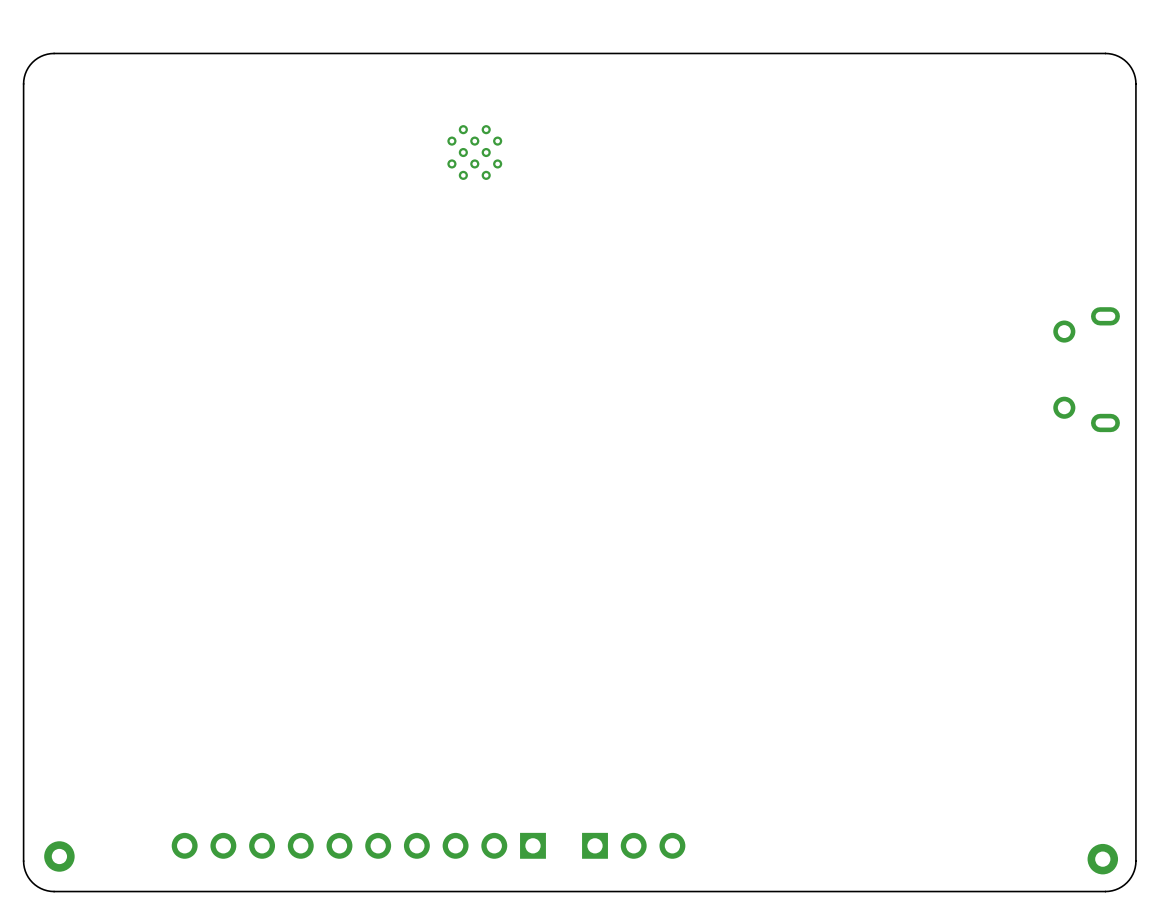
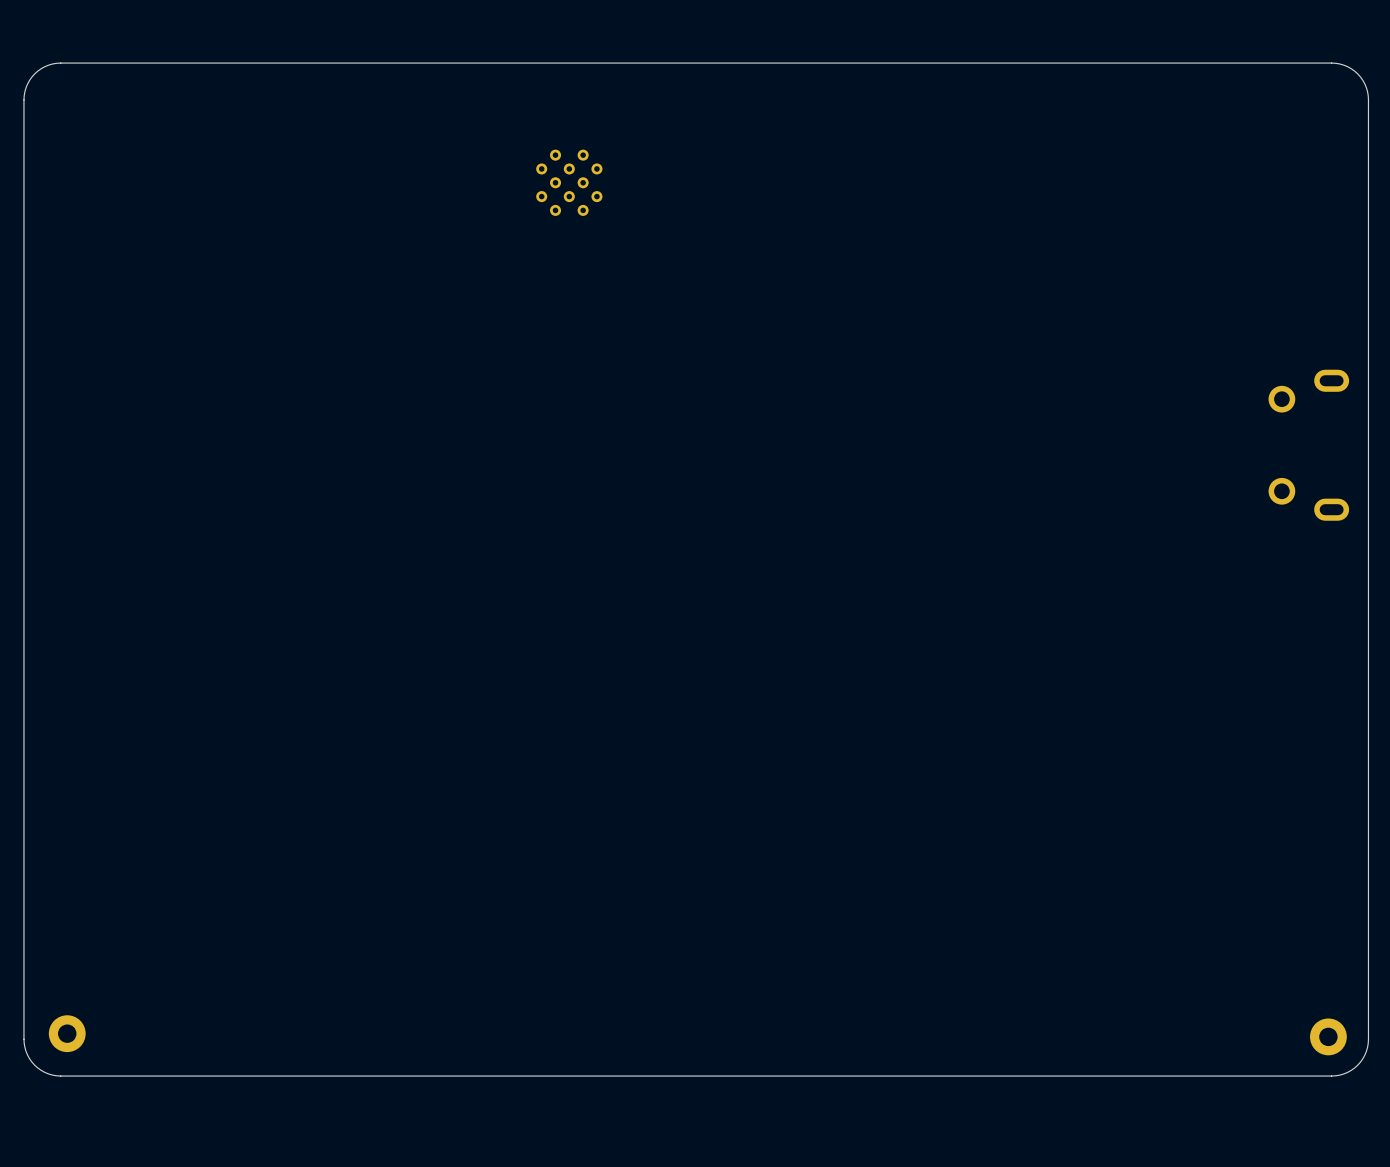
part: (358, 845) -> none
part: (633, 845) -> none

